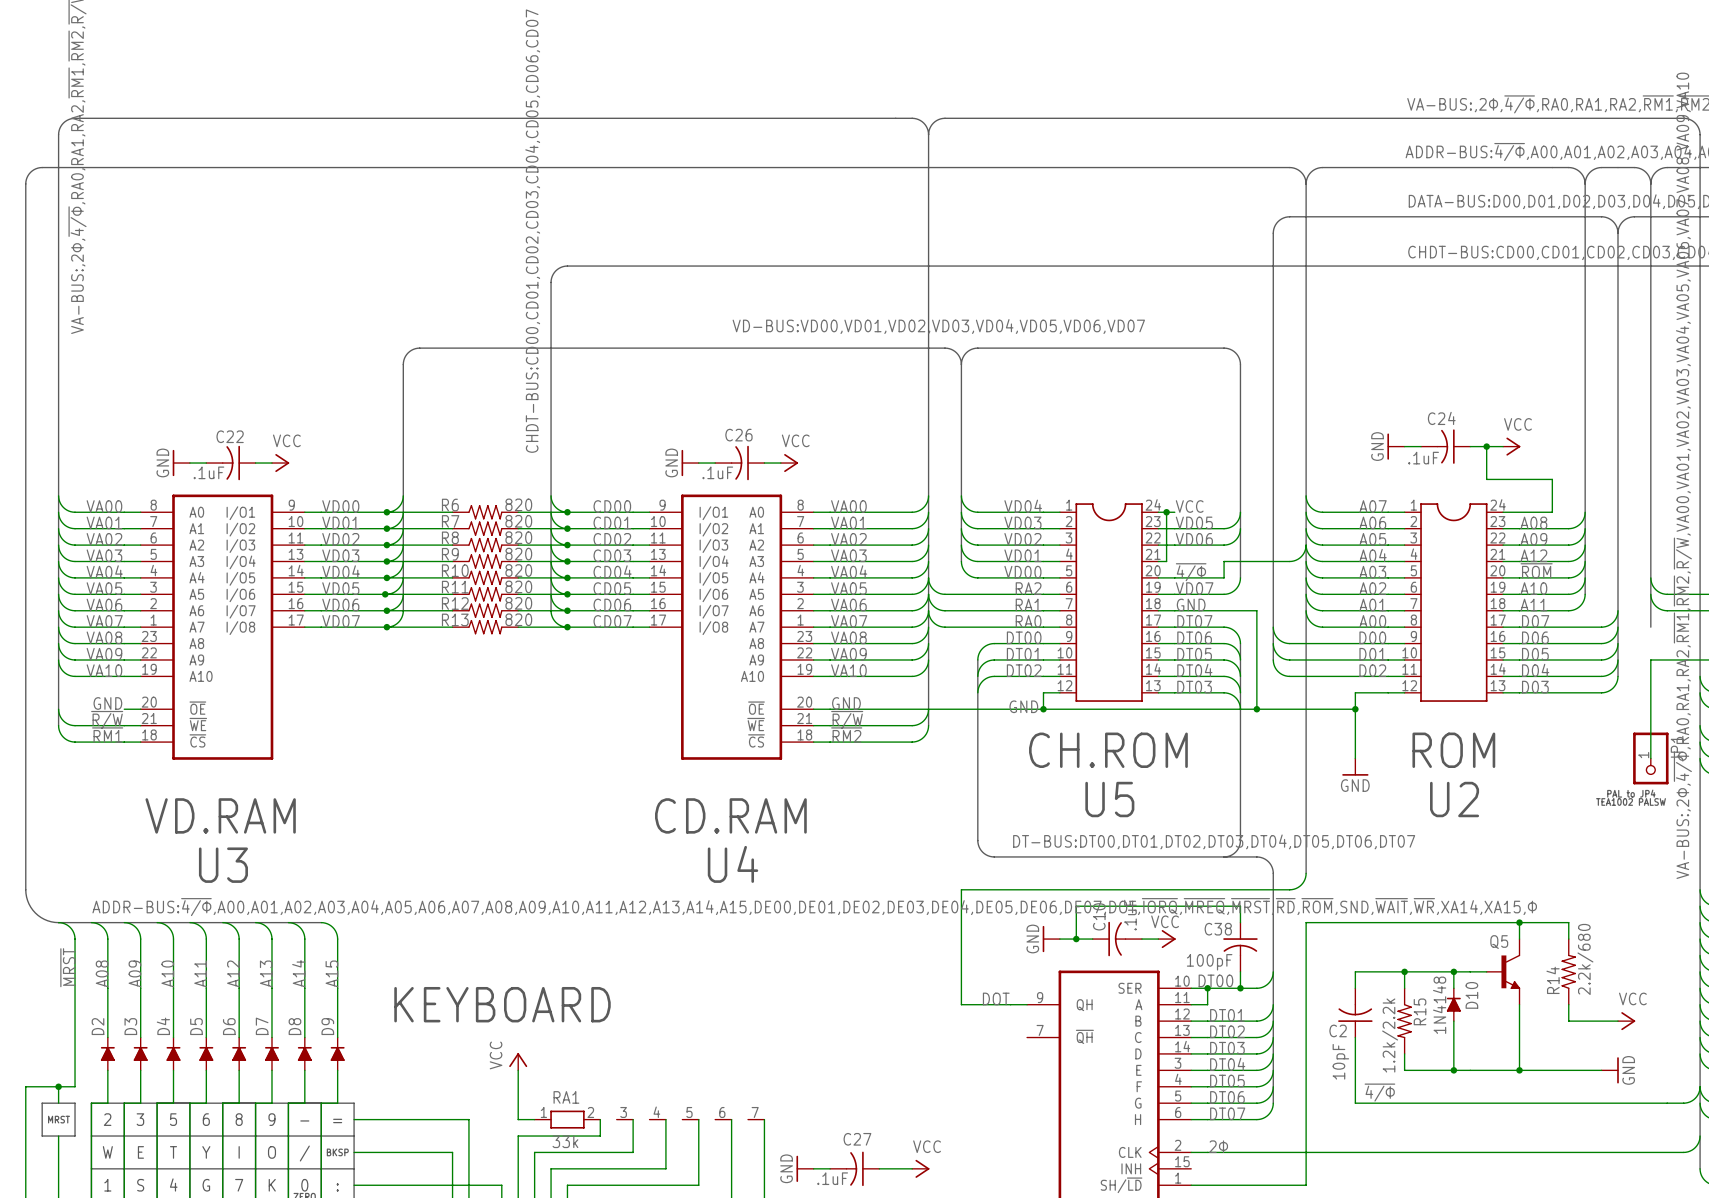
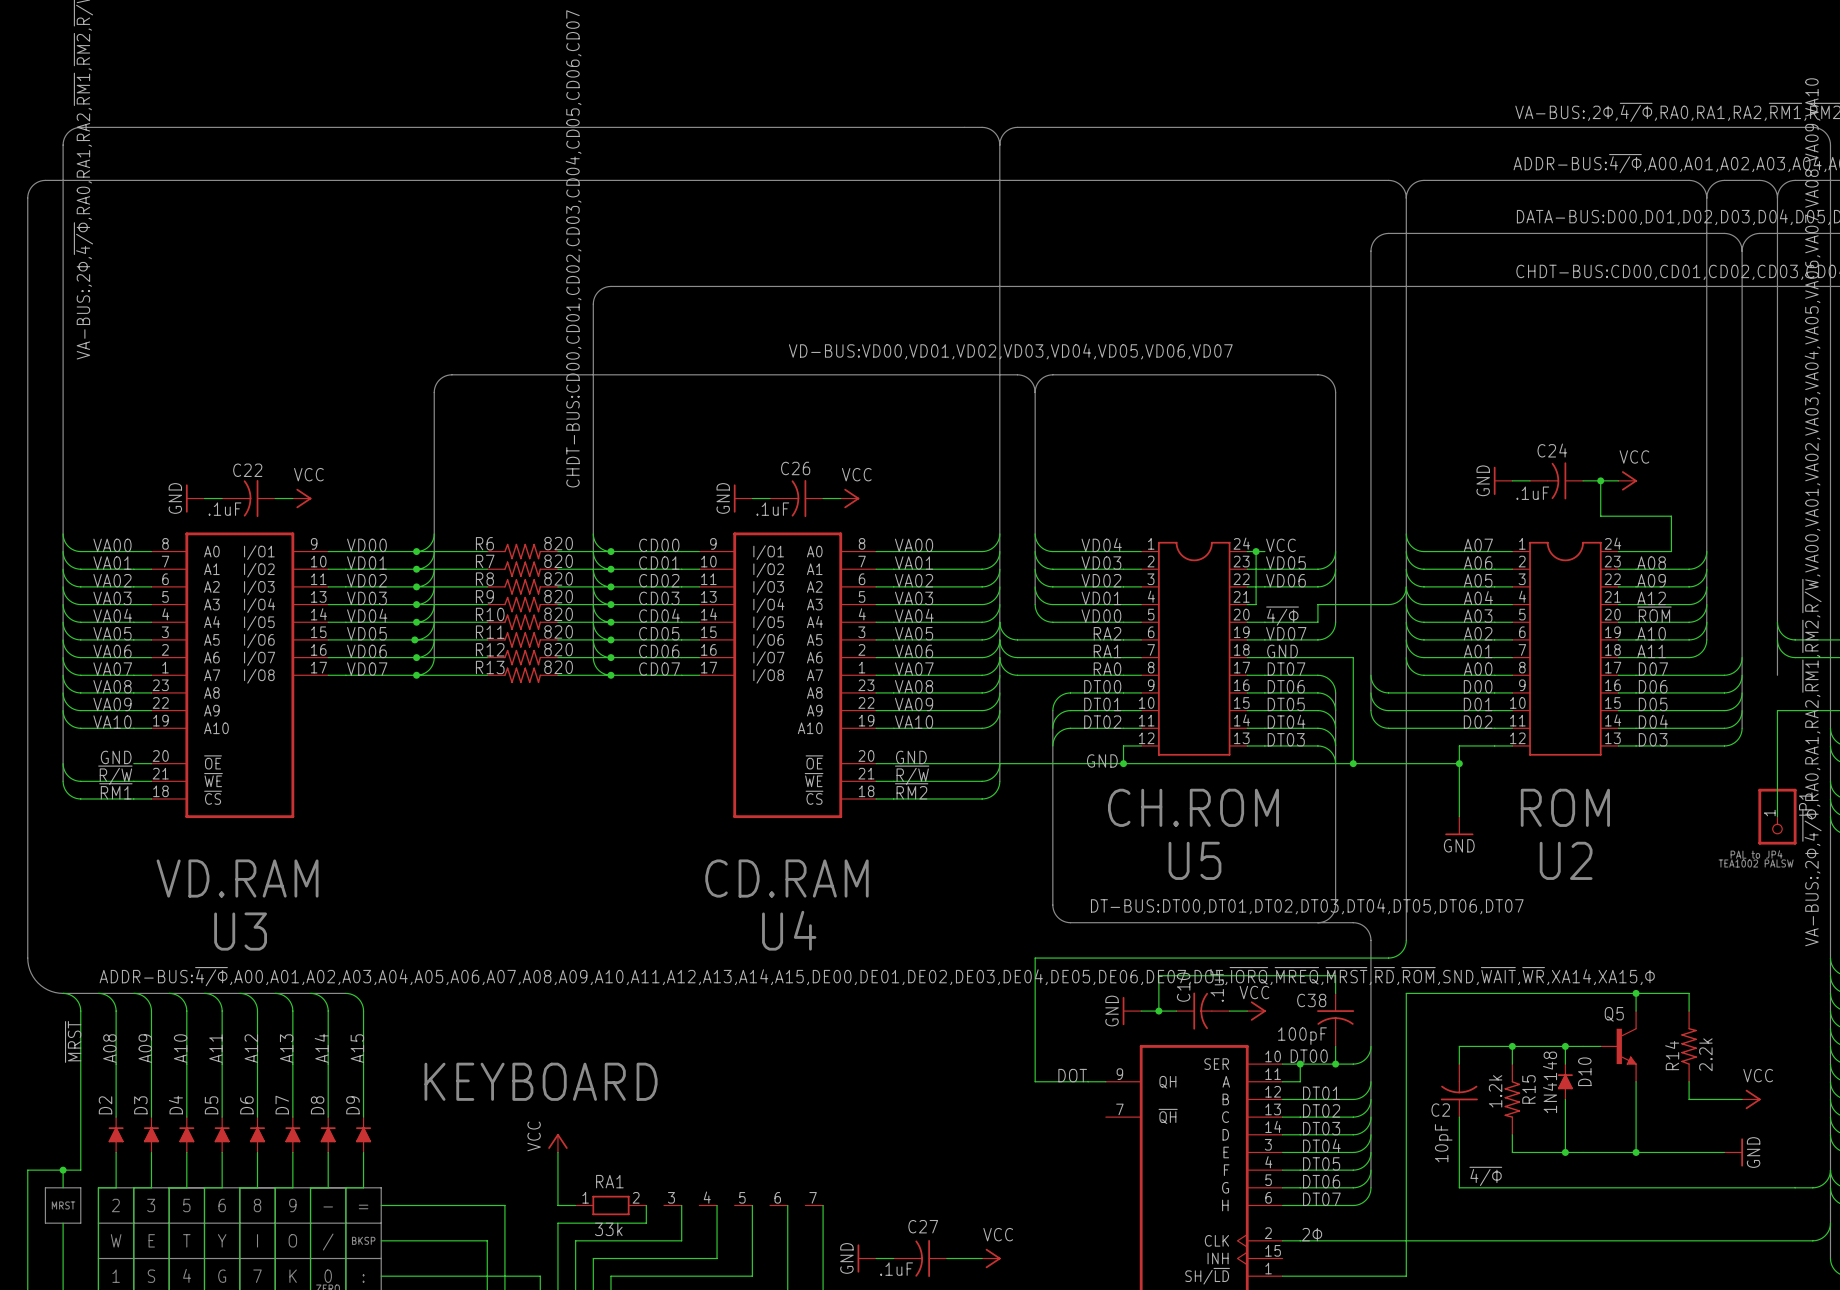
R14 value: 2.2k/680 (1585, 959) -> 2.2k (1705, 1054)
R15 value: 1.2k/2.2k (1390, 1035) -> 1.2k (1495, 1091)

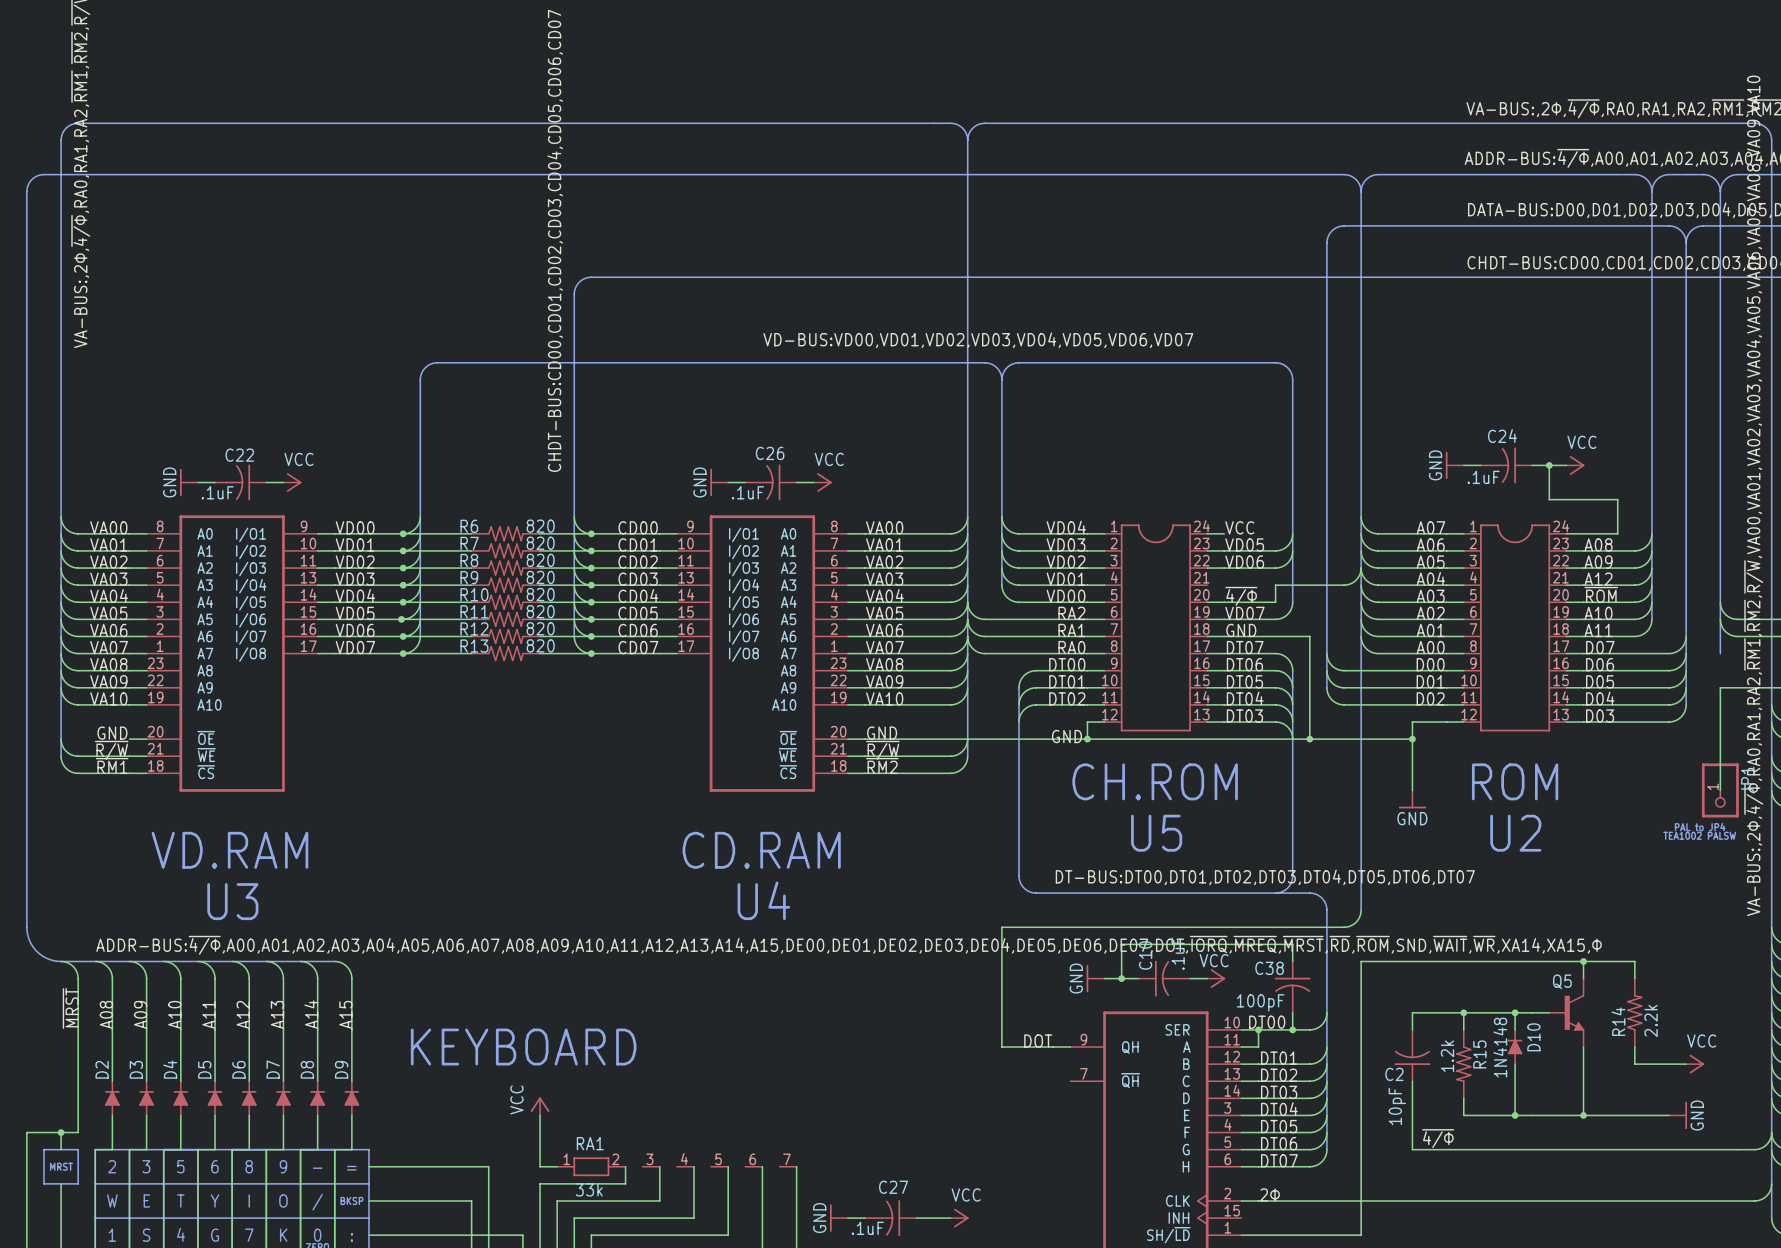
wire: (1256, 551) (1256, 604) (1247, 604) -> none
junction: (1256, 551) -> none

